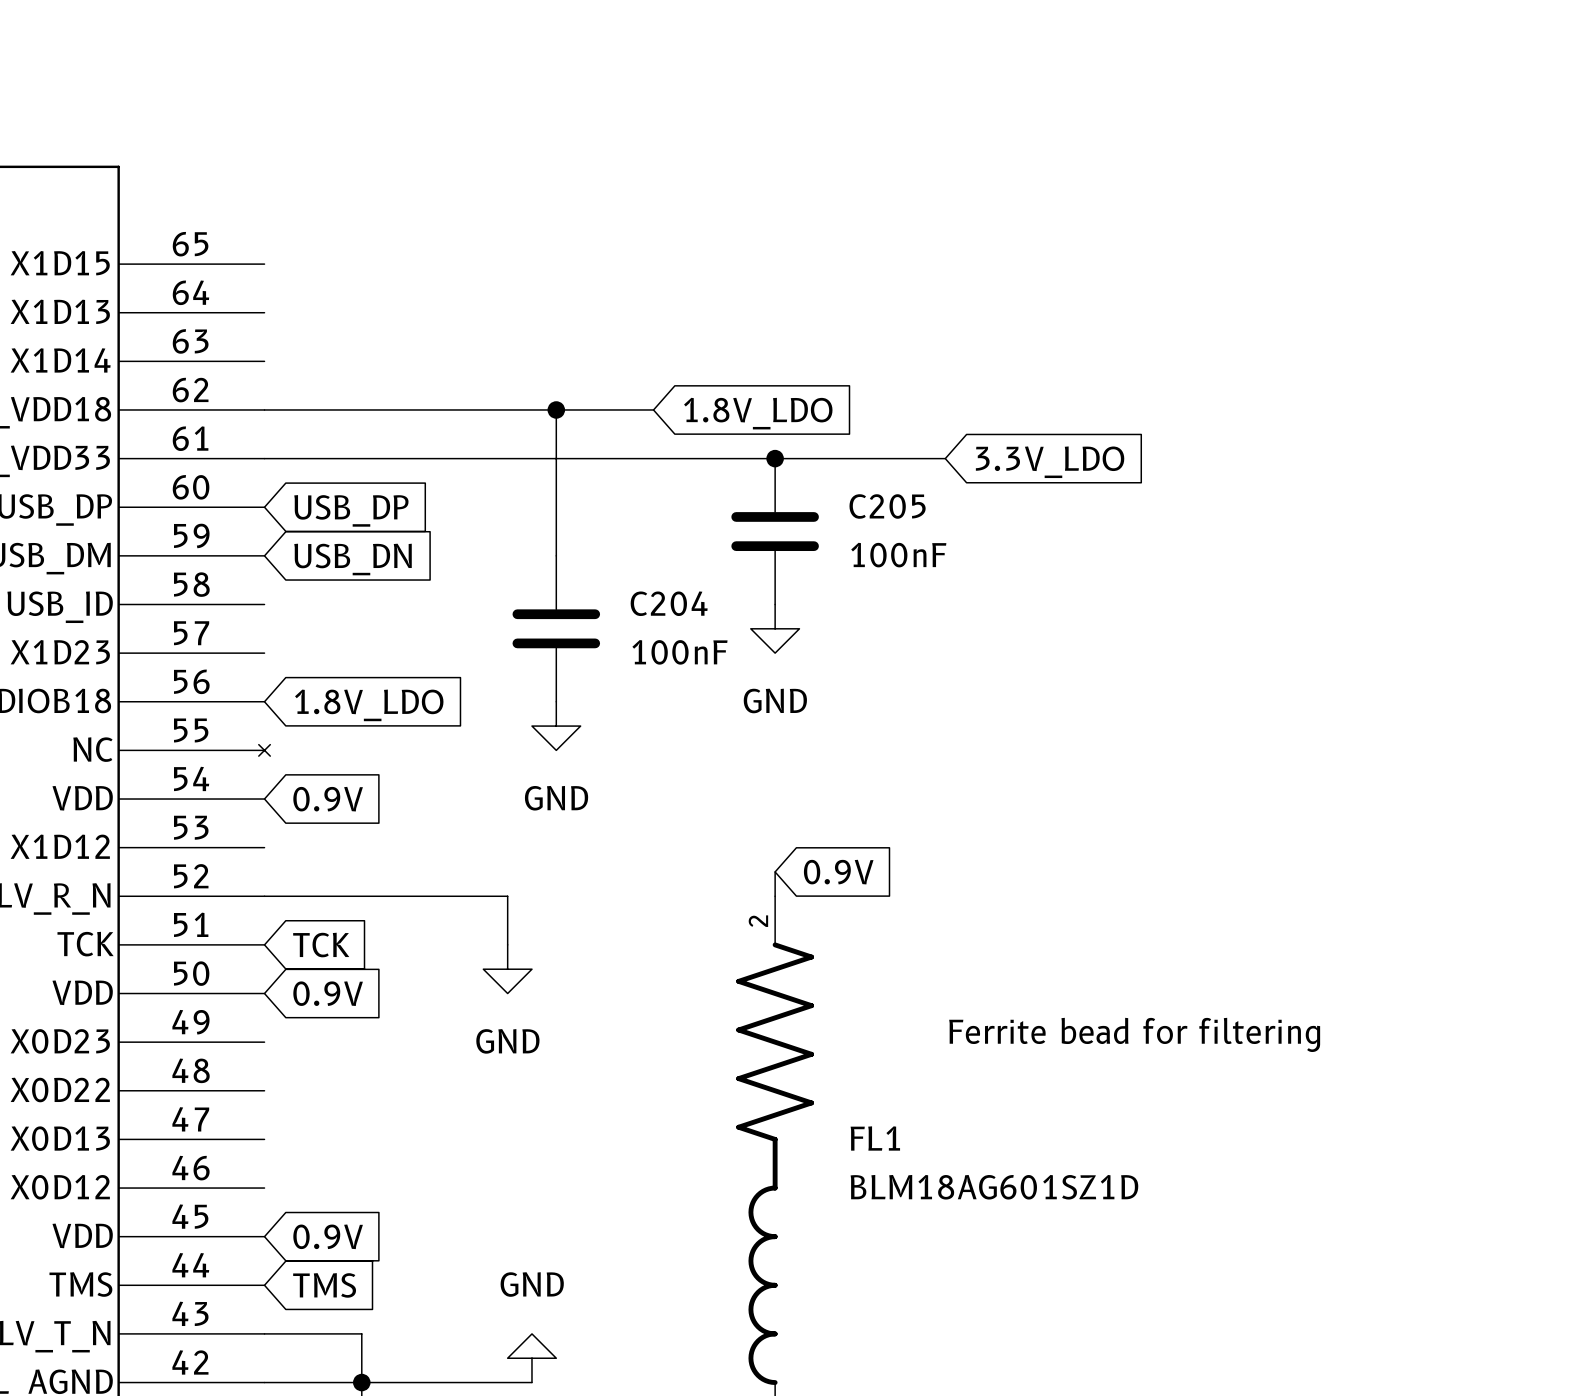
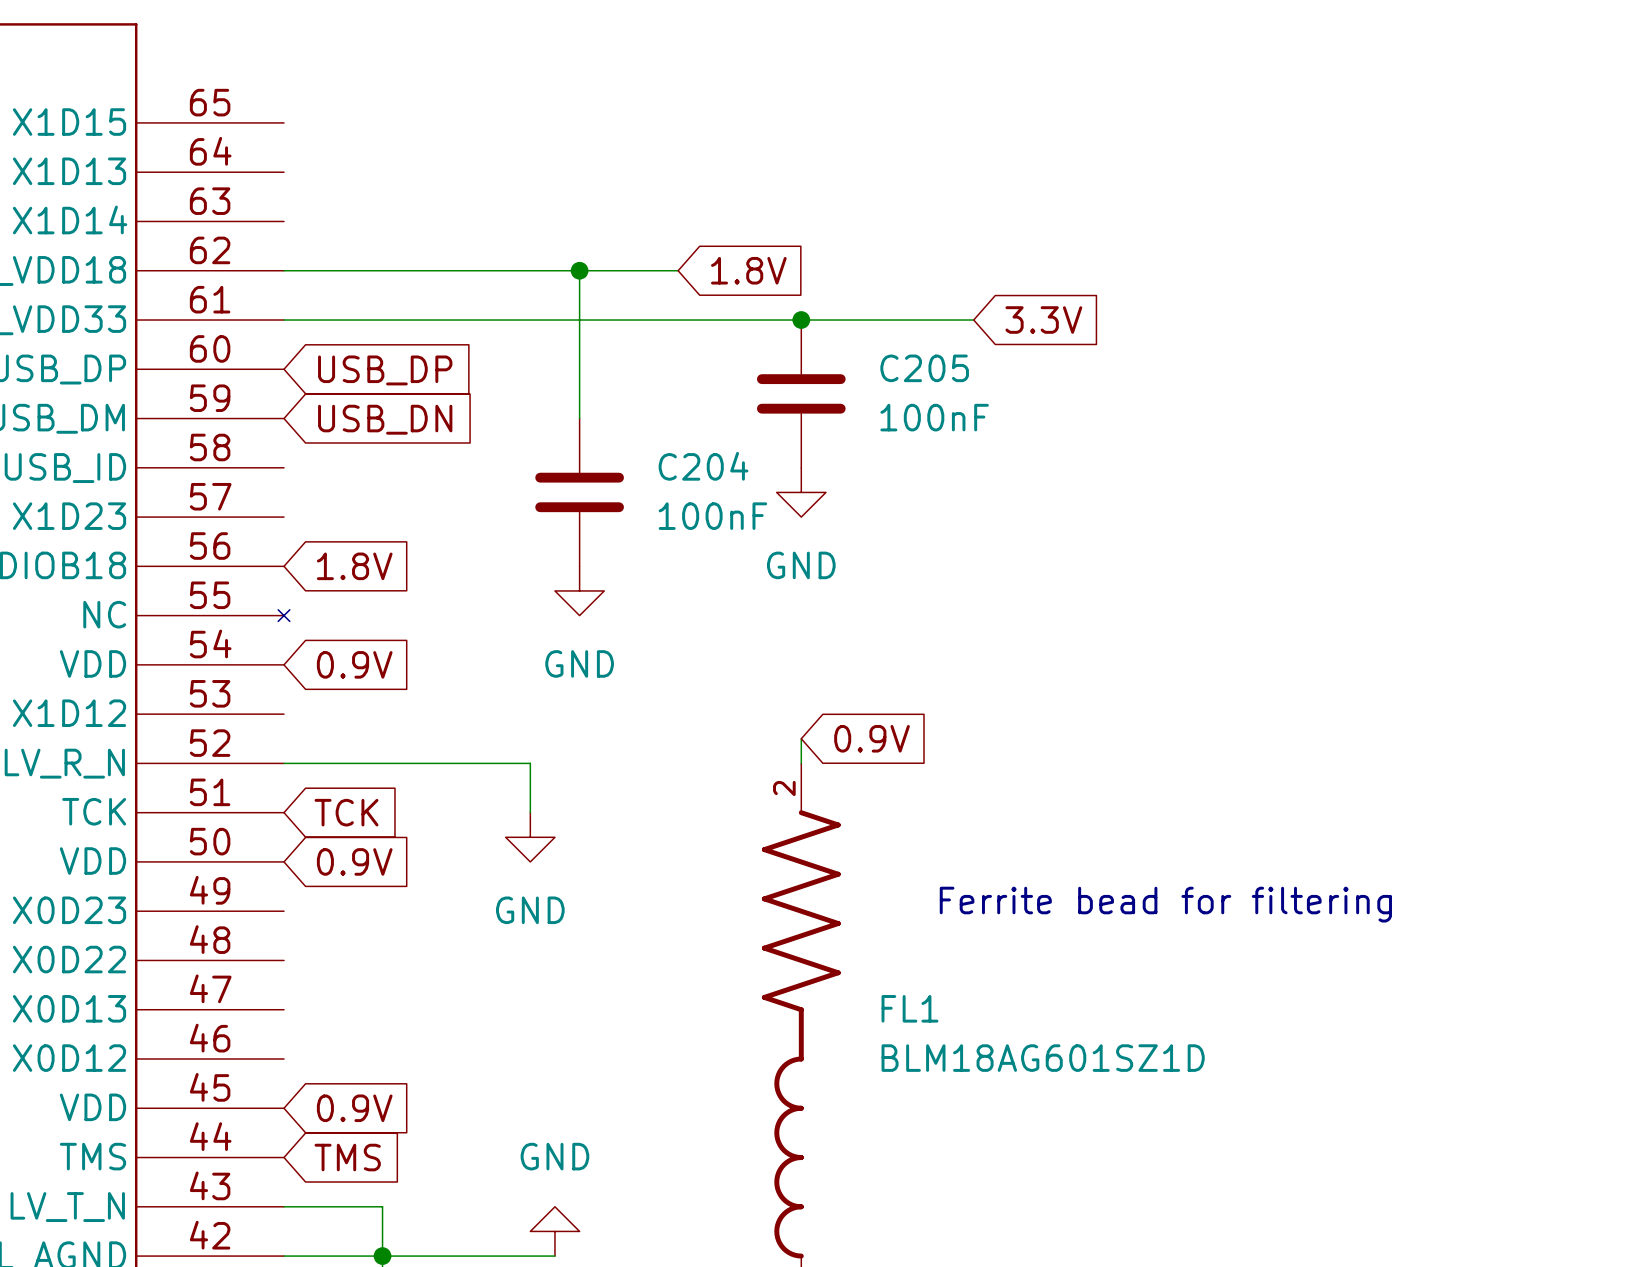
global label: 1.8V_LDO (758, 413) -> 1.8V (748, 270)
global label: 3.3V_LDO (1050, 462) -> 3.3V (1043, 320)
global label: 1.8V_LDO (369, 705) -> 1.8V (354, 566)

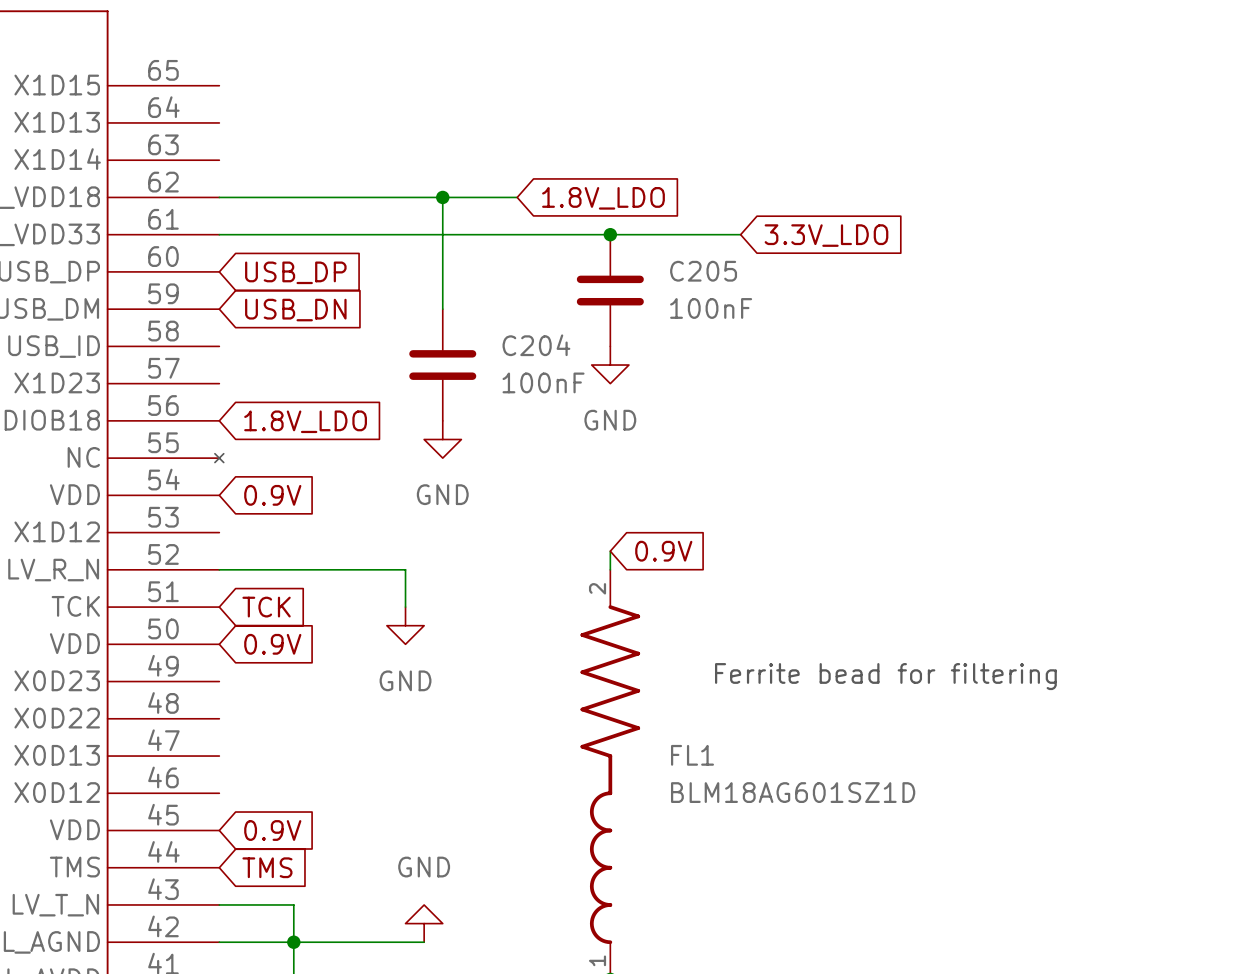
global label: 1.8V (748, 270) -> 1.8V_LDO (603, 198)
global label: 3.3V (1043, 320) -> 3.3V_LDO (826, 235)
global label: 1.8V (354, 566) -> 1.8V_LDO (305, 421)

